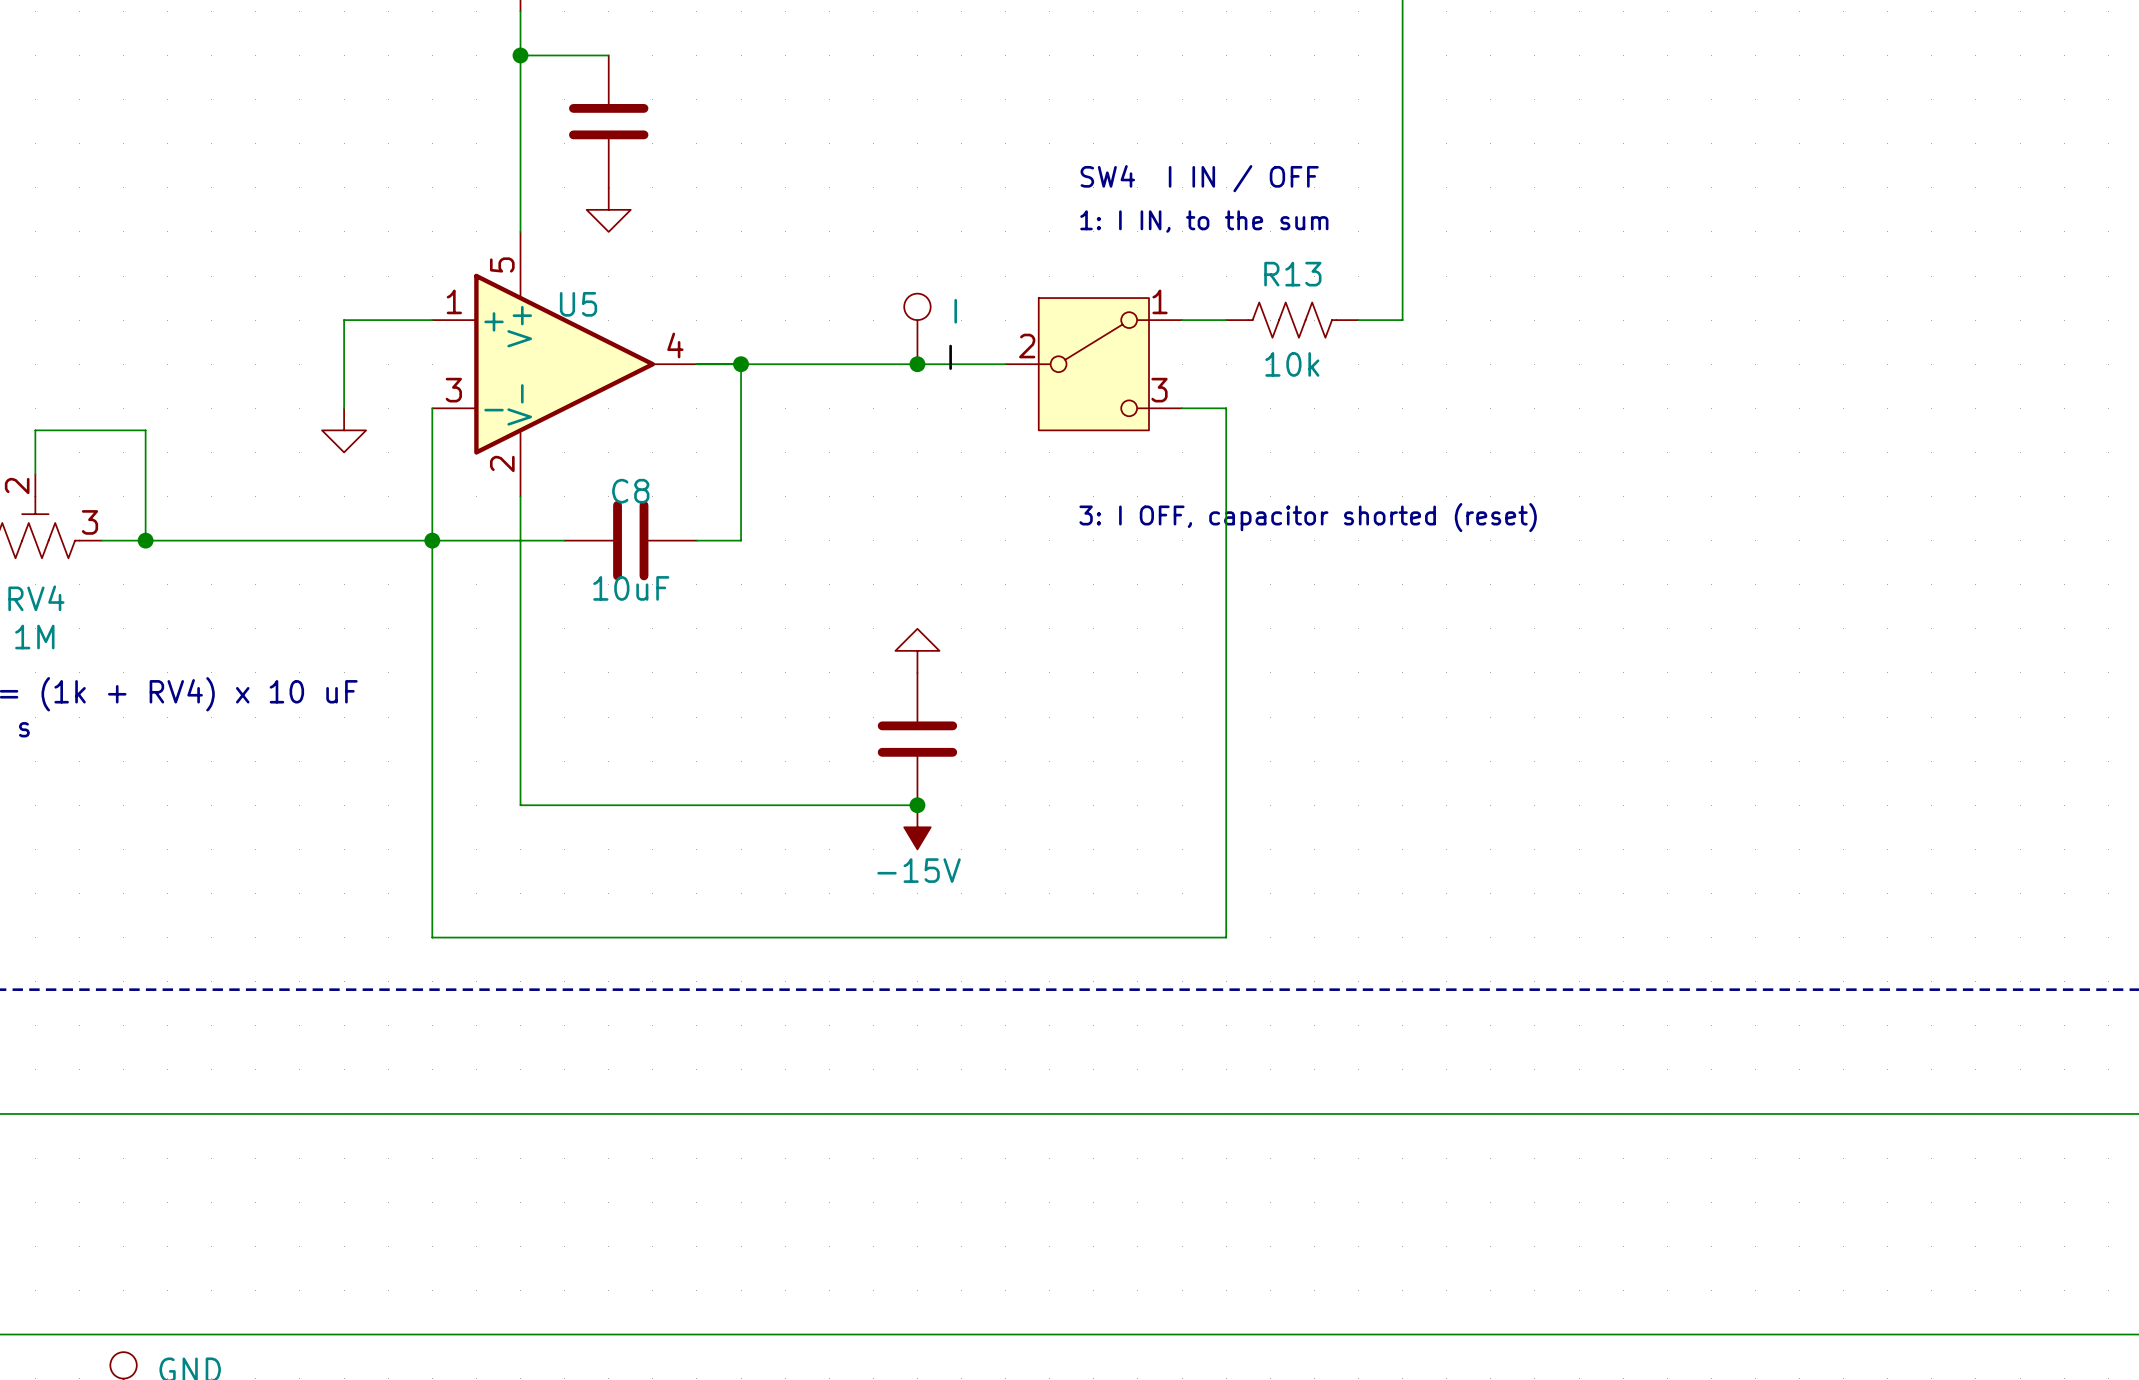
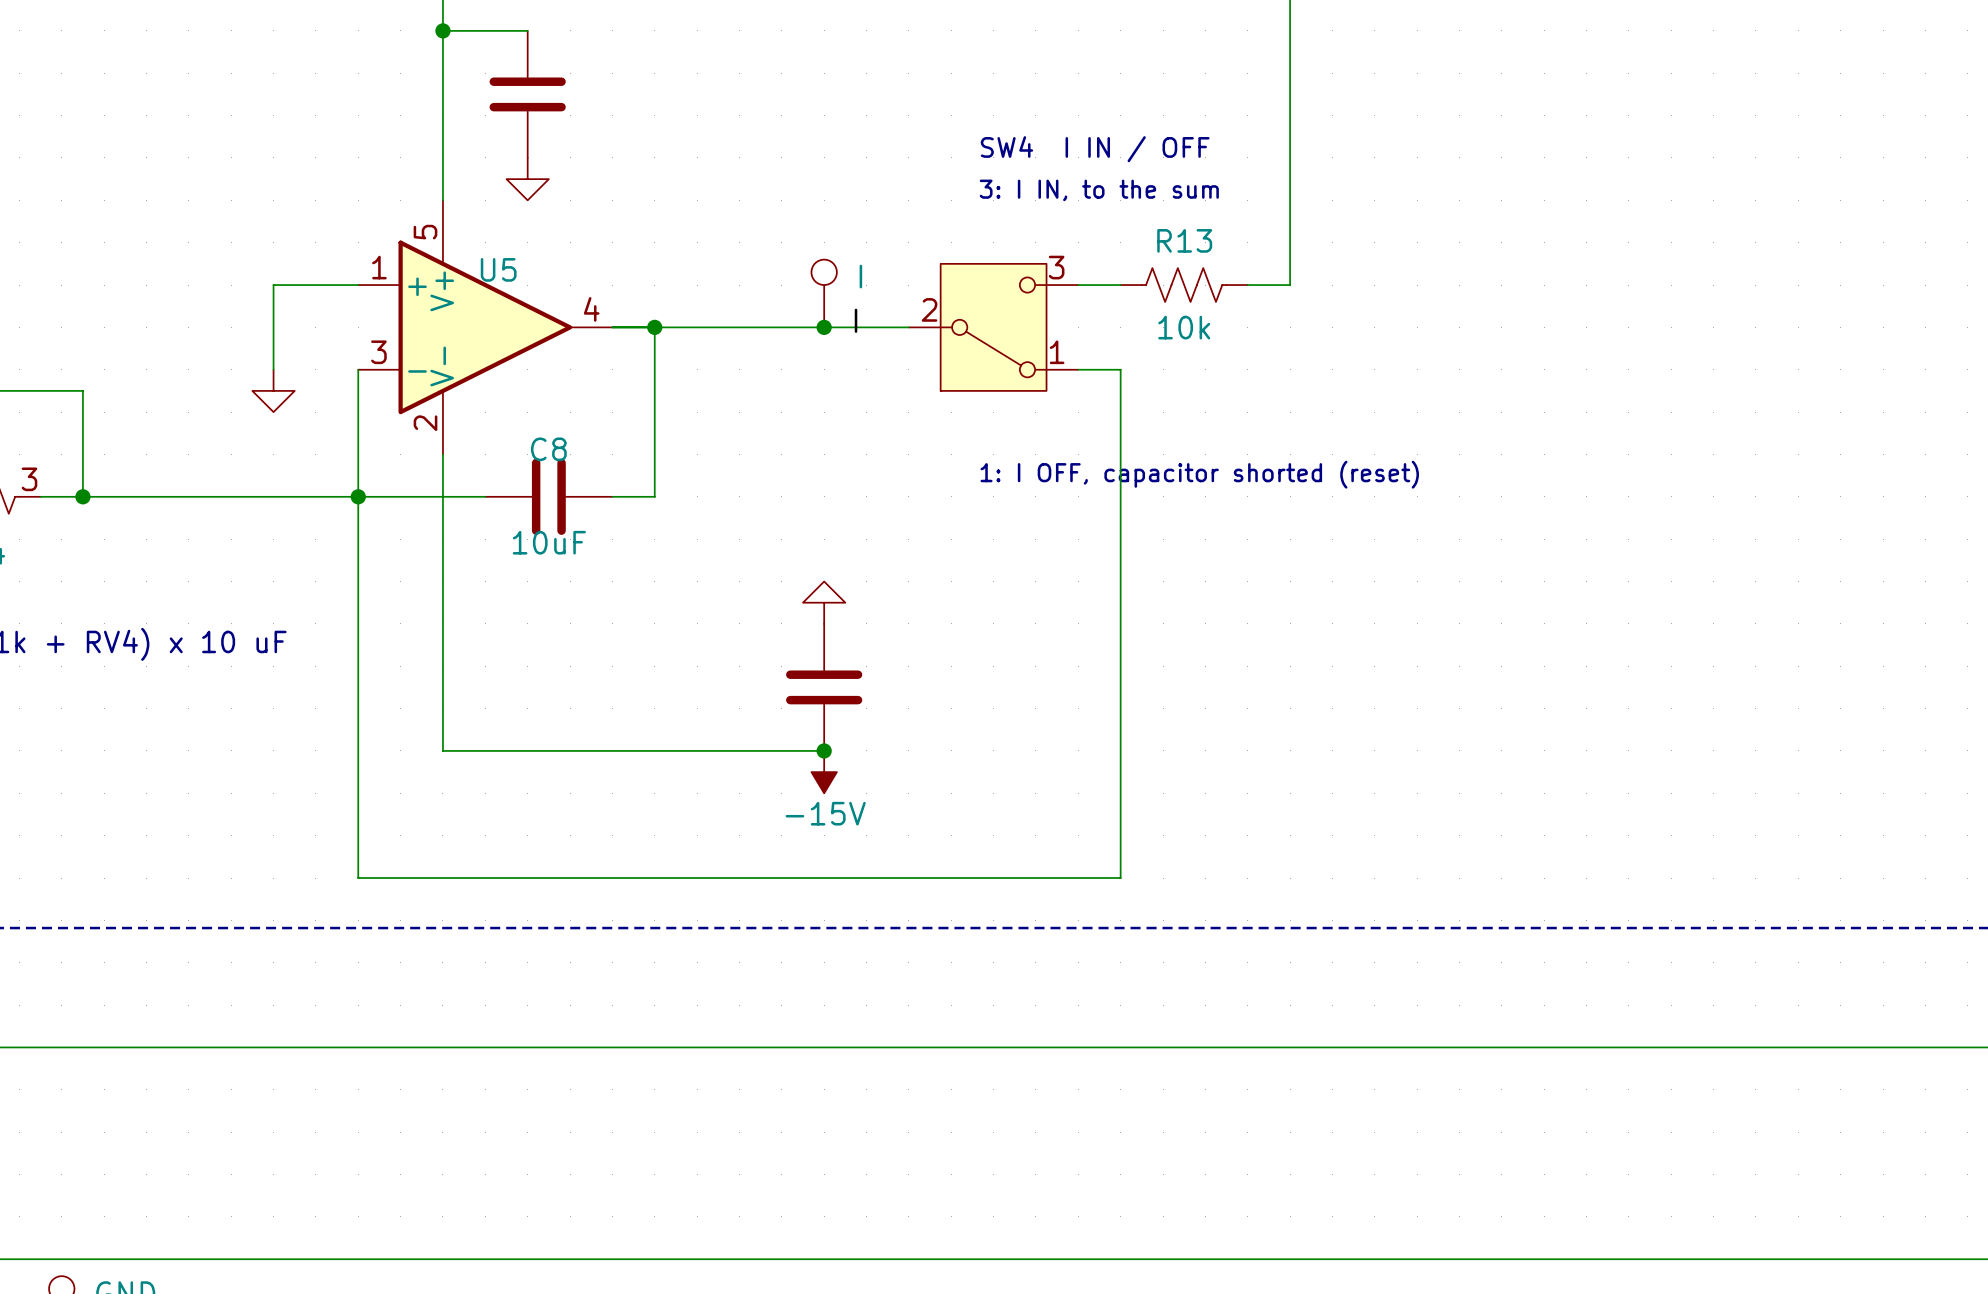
text: 1: I IN, to the sum (1204, 221) -> 3: I IN, to the sum (1099, 190)
part flip: as is (1093, 364) -> up-down (993, 327)
text: 3: I OFF, capacitor shorted (reset) (1308, 517) -> 1: I OFF, capacitor shorted (reset) (1199, 474)

